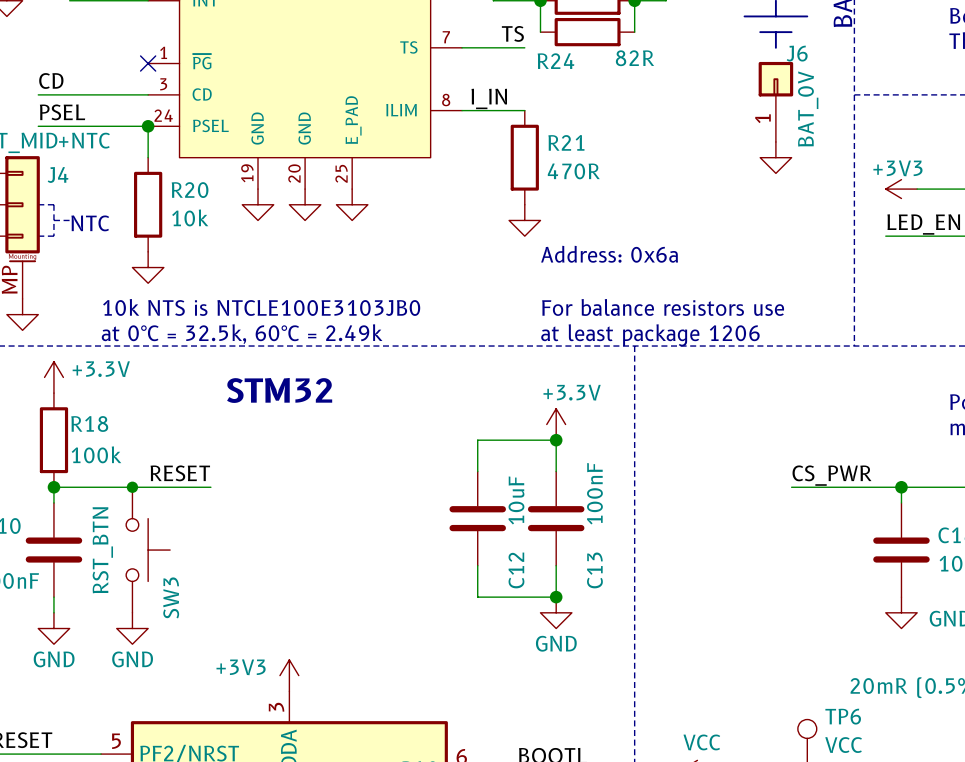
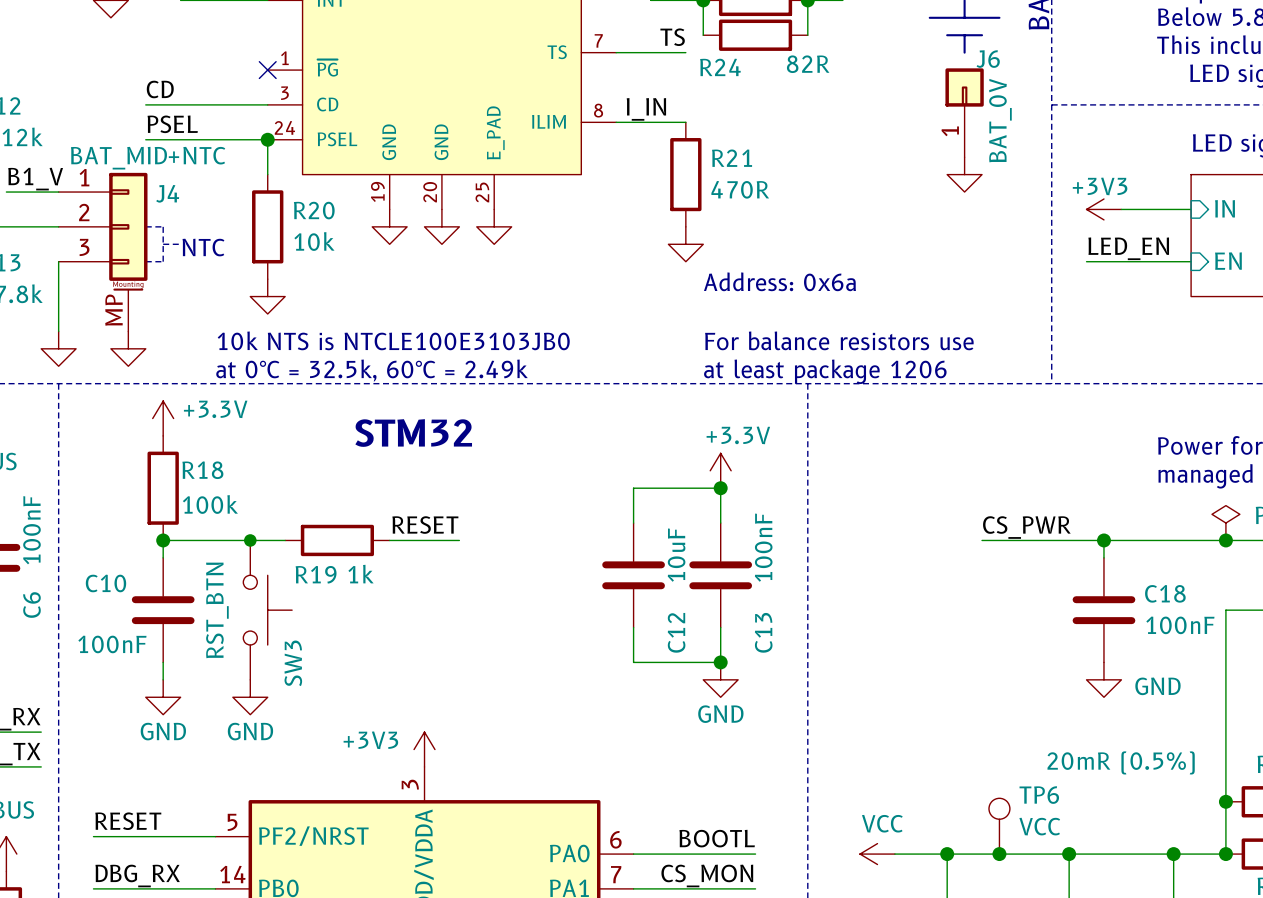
label position: RESET (180, 473) -> RESET (425, 525)
wire: (163, 487) (210, 487) -> none
R19: none -> 1k (337, 540)
wire: none -> (389, 540) (459, 540)

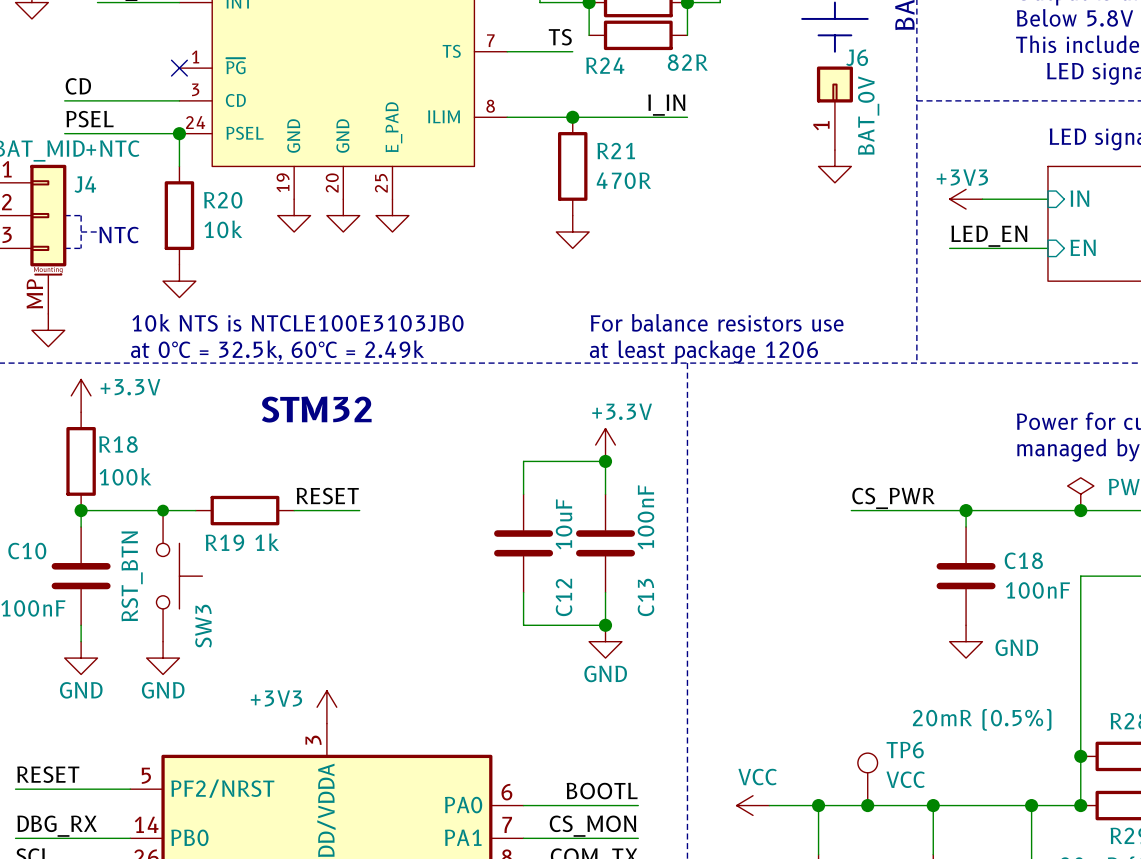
label position: I_IN (646, 109) -> I_IN (666, 105)
wire: none -> (572, 117) (687, 117)
junction: none -> (572, 117)
text: Address: 0x6a (779, 281) -> none

